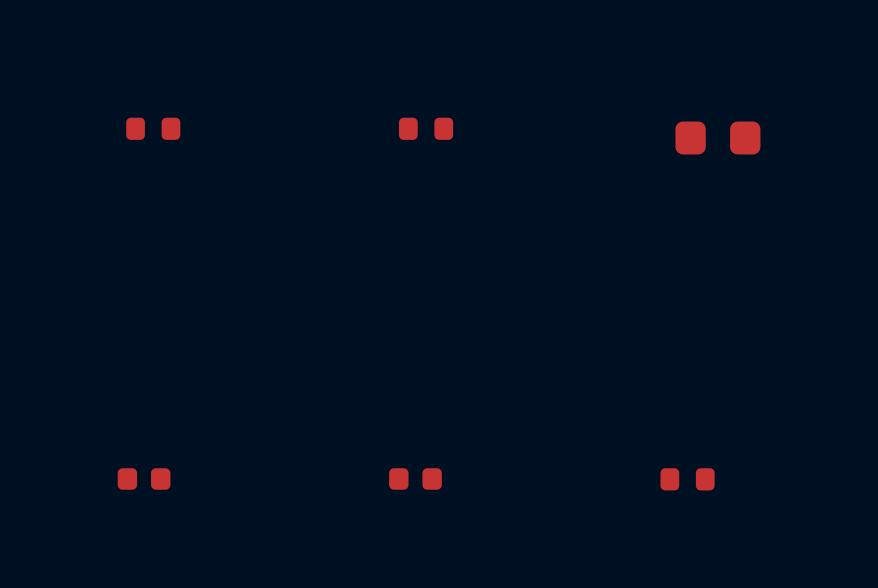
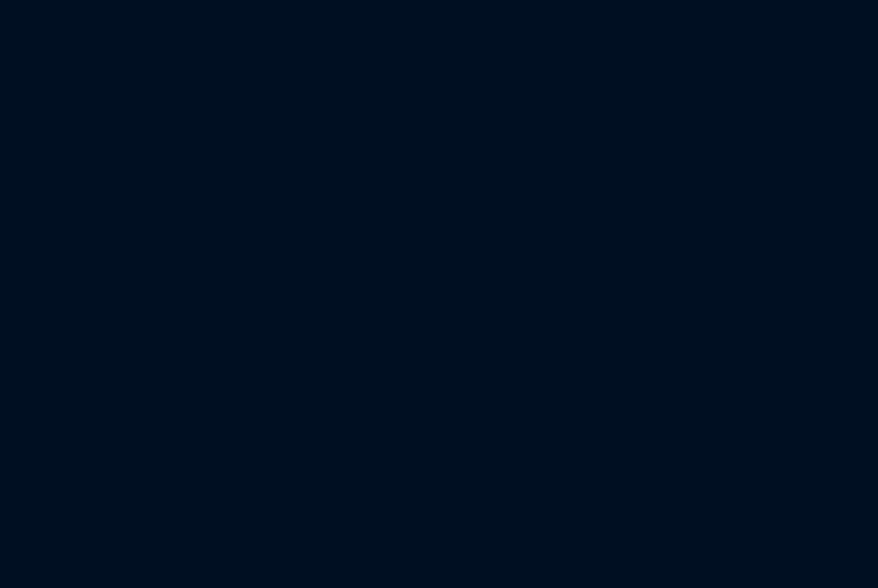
part: (153, 128) -> none
part: (426, 128) -> none
part: (717, 137) -> none
part: (144, 478) -> none
part: (415, 478) -> none
part: (687, 479) -> none

